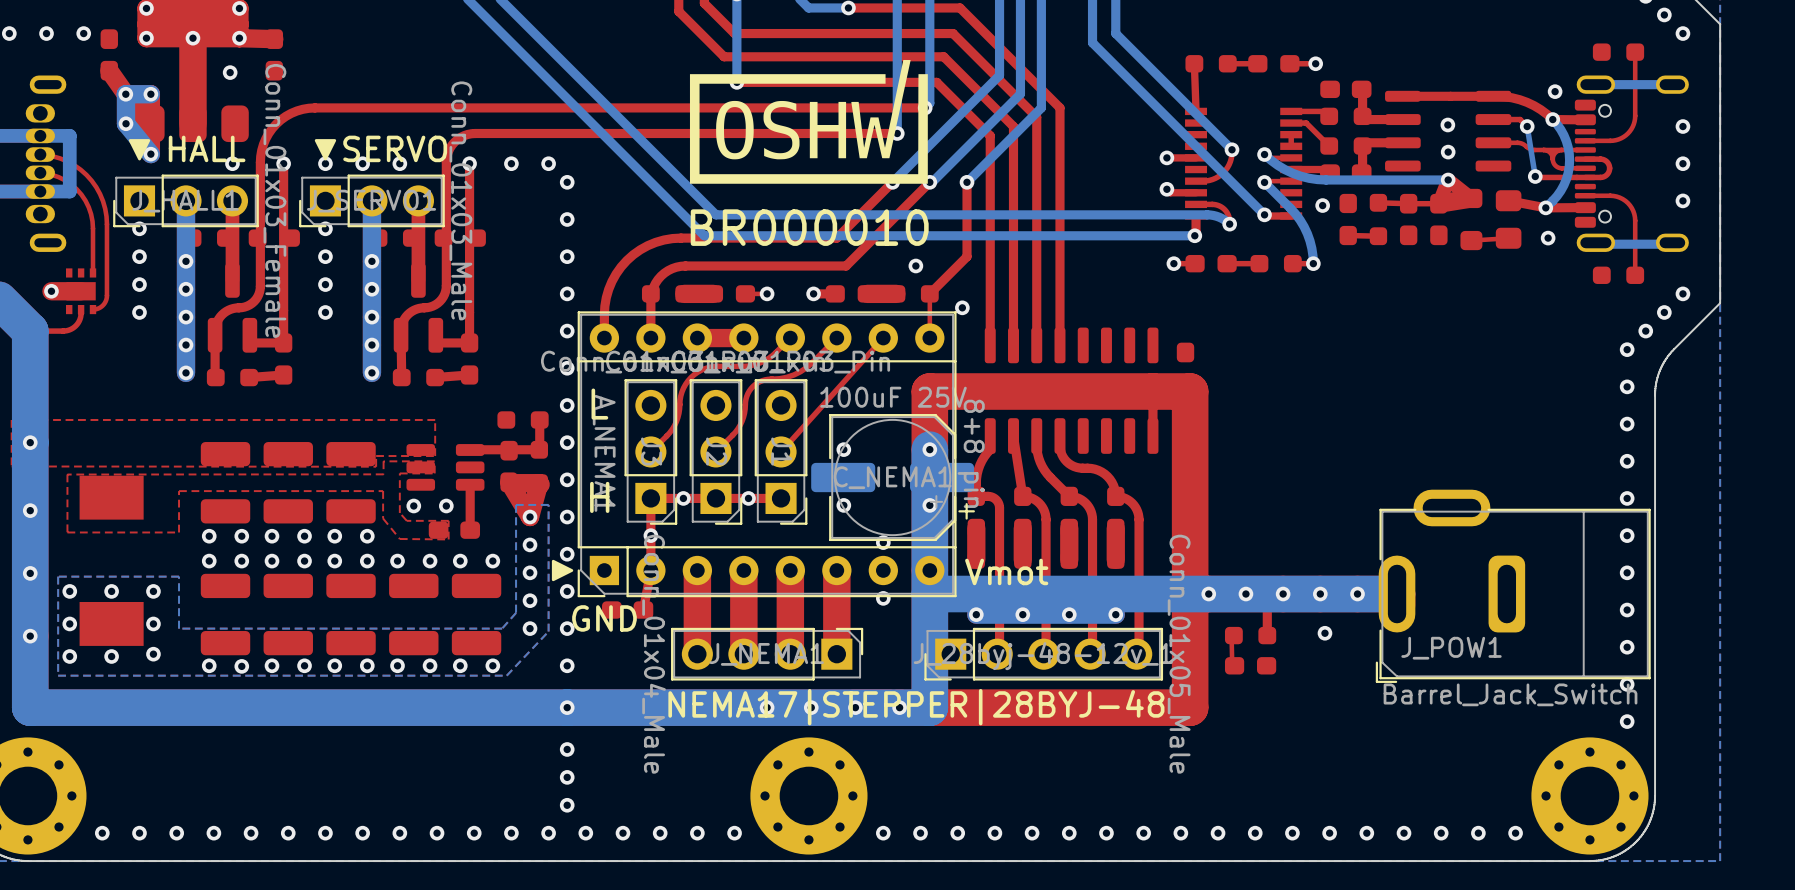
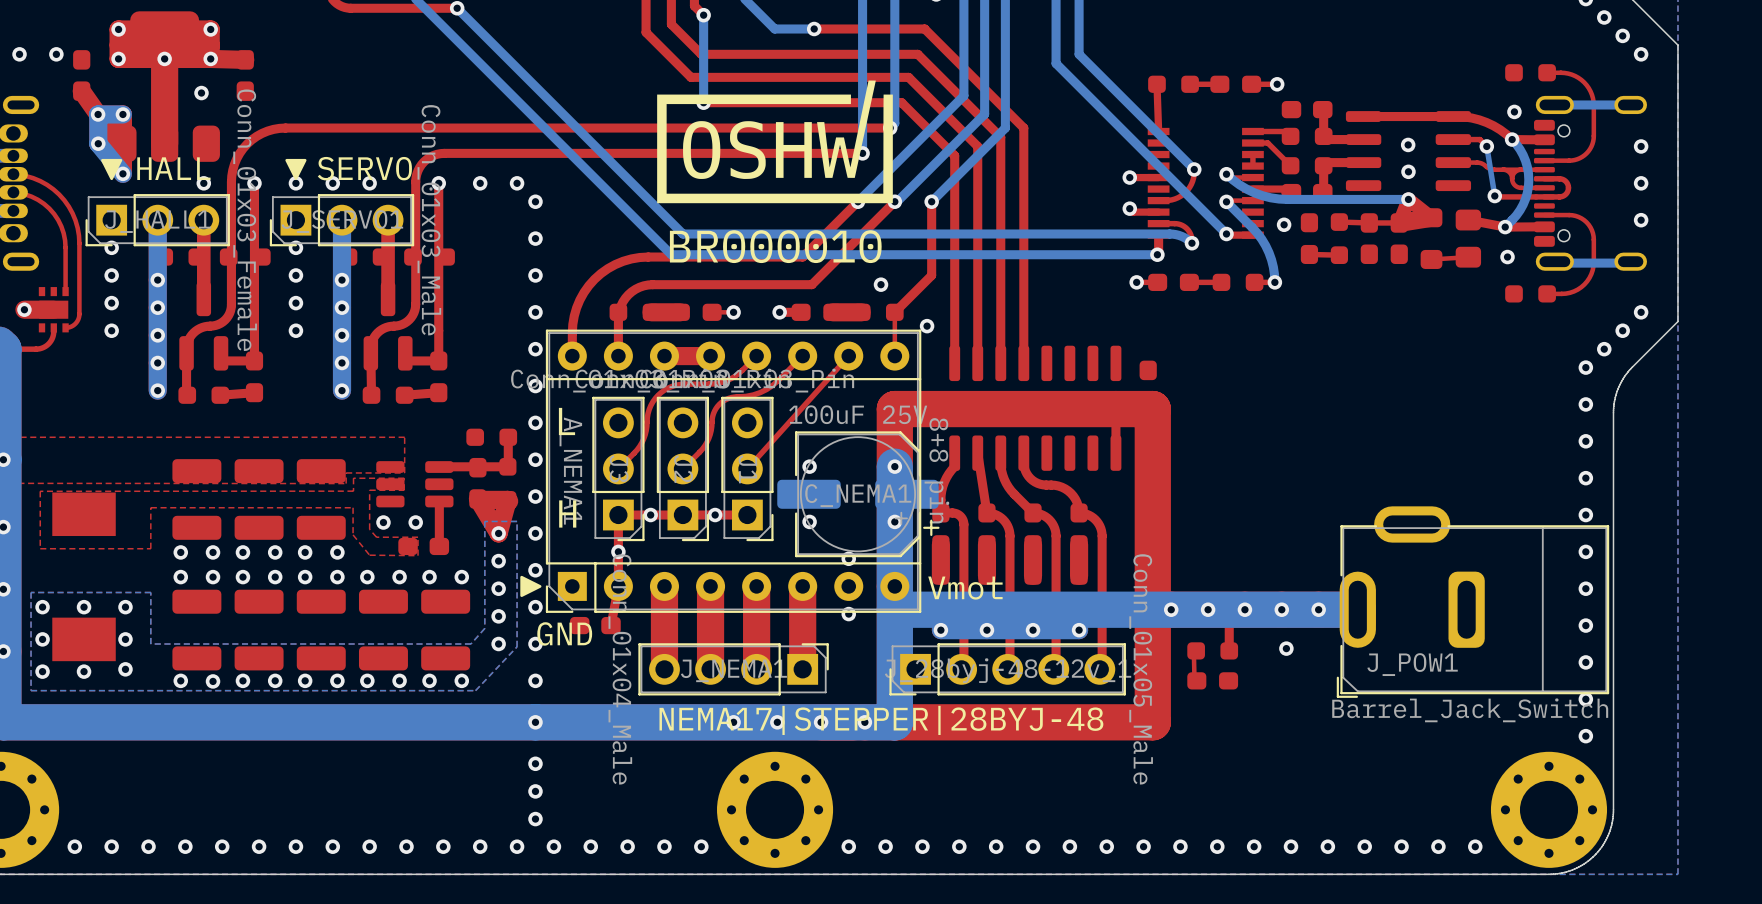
part position: (1618, 52) -> (1530, 72)
top track: (1635, 52) (1635, 85) -> (1547, 72) (1564, 72) (1578, 77) (1588, 88) (1593, 105)
bottom track: (40, 135) (69, 135) (69, 191) (40, 191) -> none
top track: (1635, 242) (1635, 275) -> (1593, 261) (1591, 274) (1581, 287) (1565, 293) (1547, 293)
part position: (1618, 275) -> (1530, 293)

